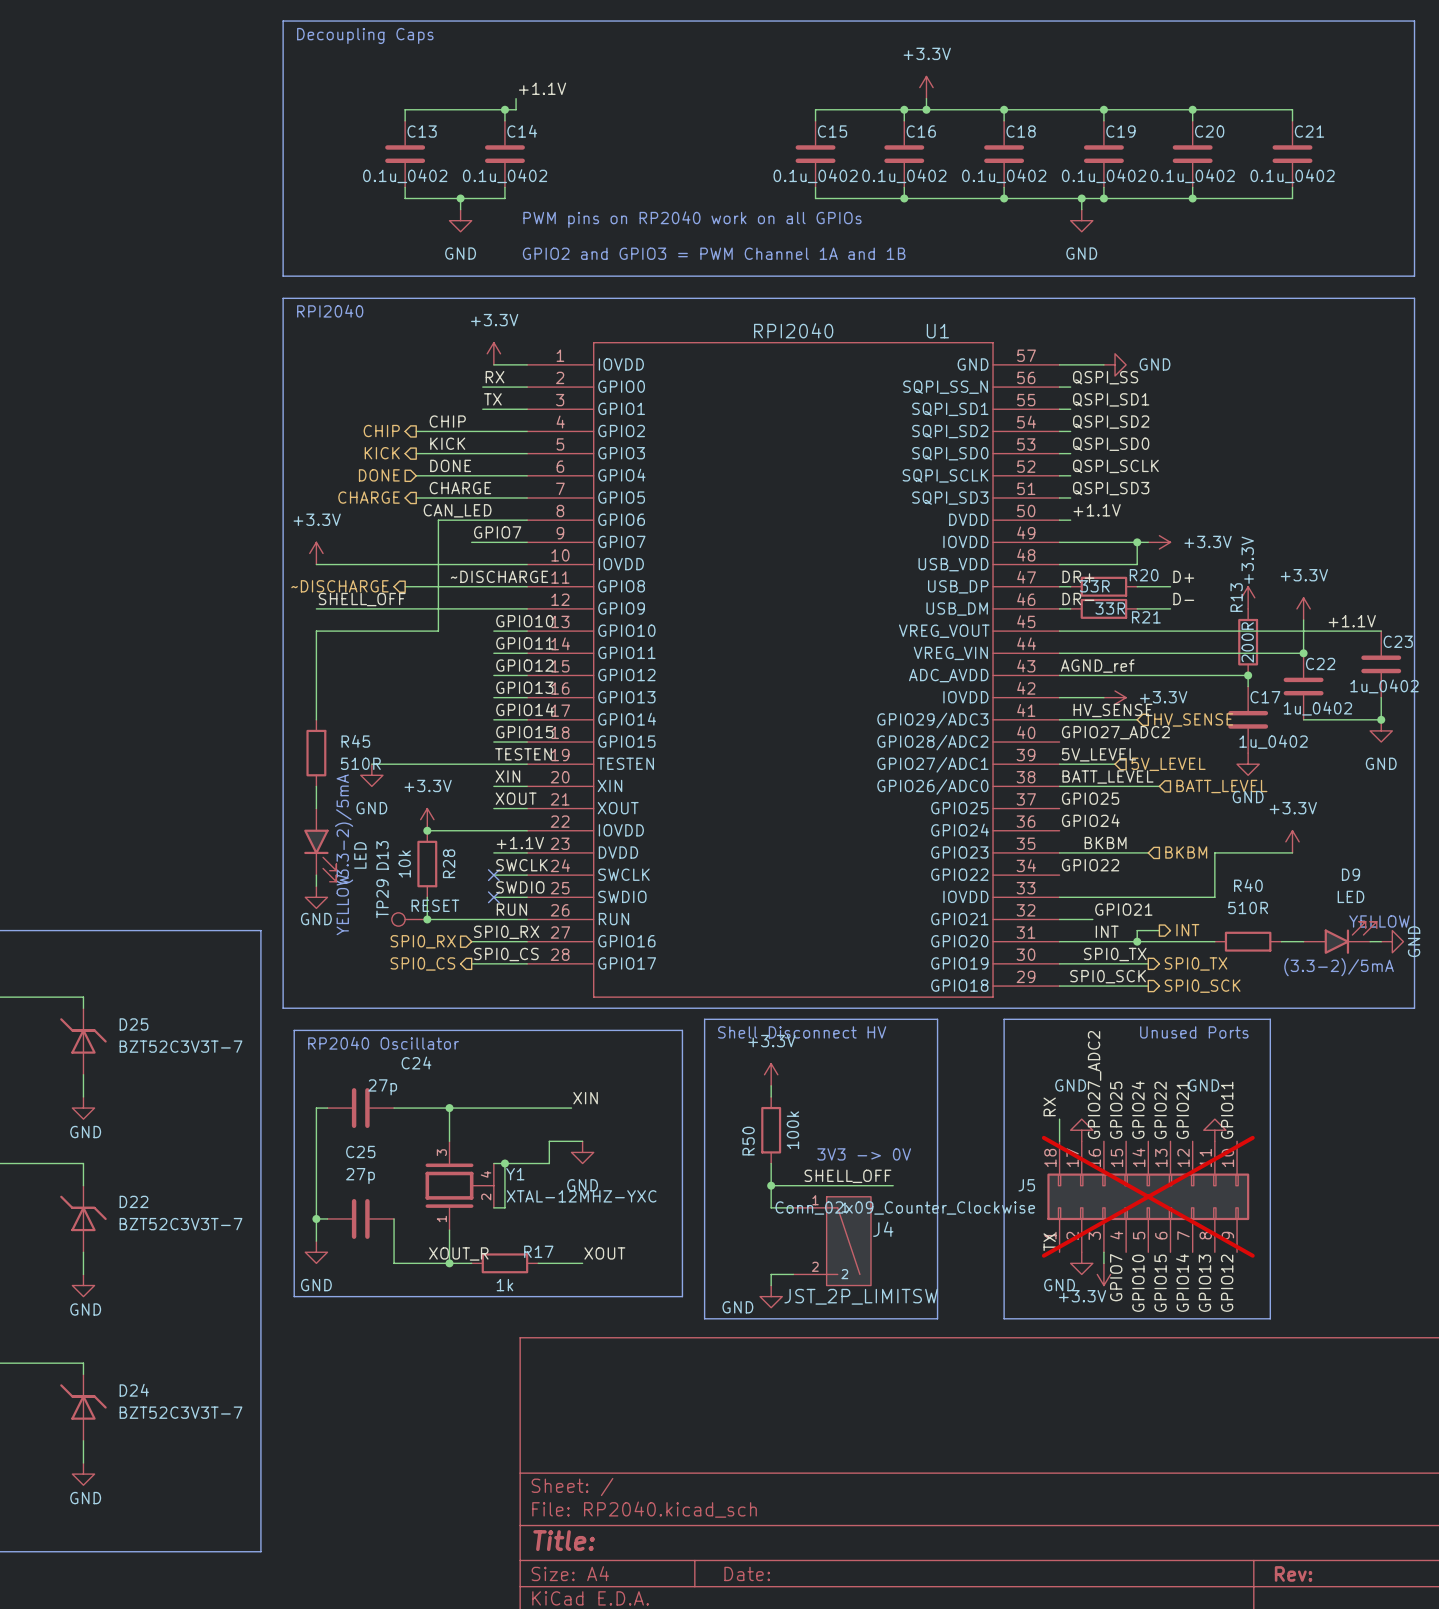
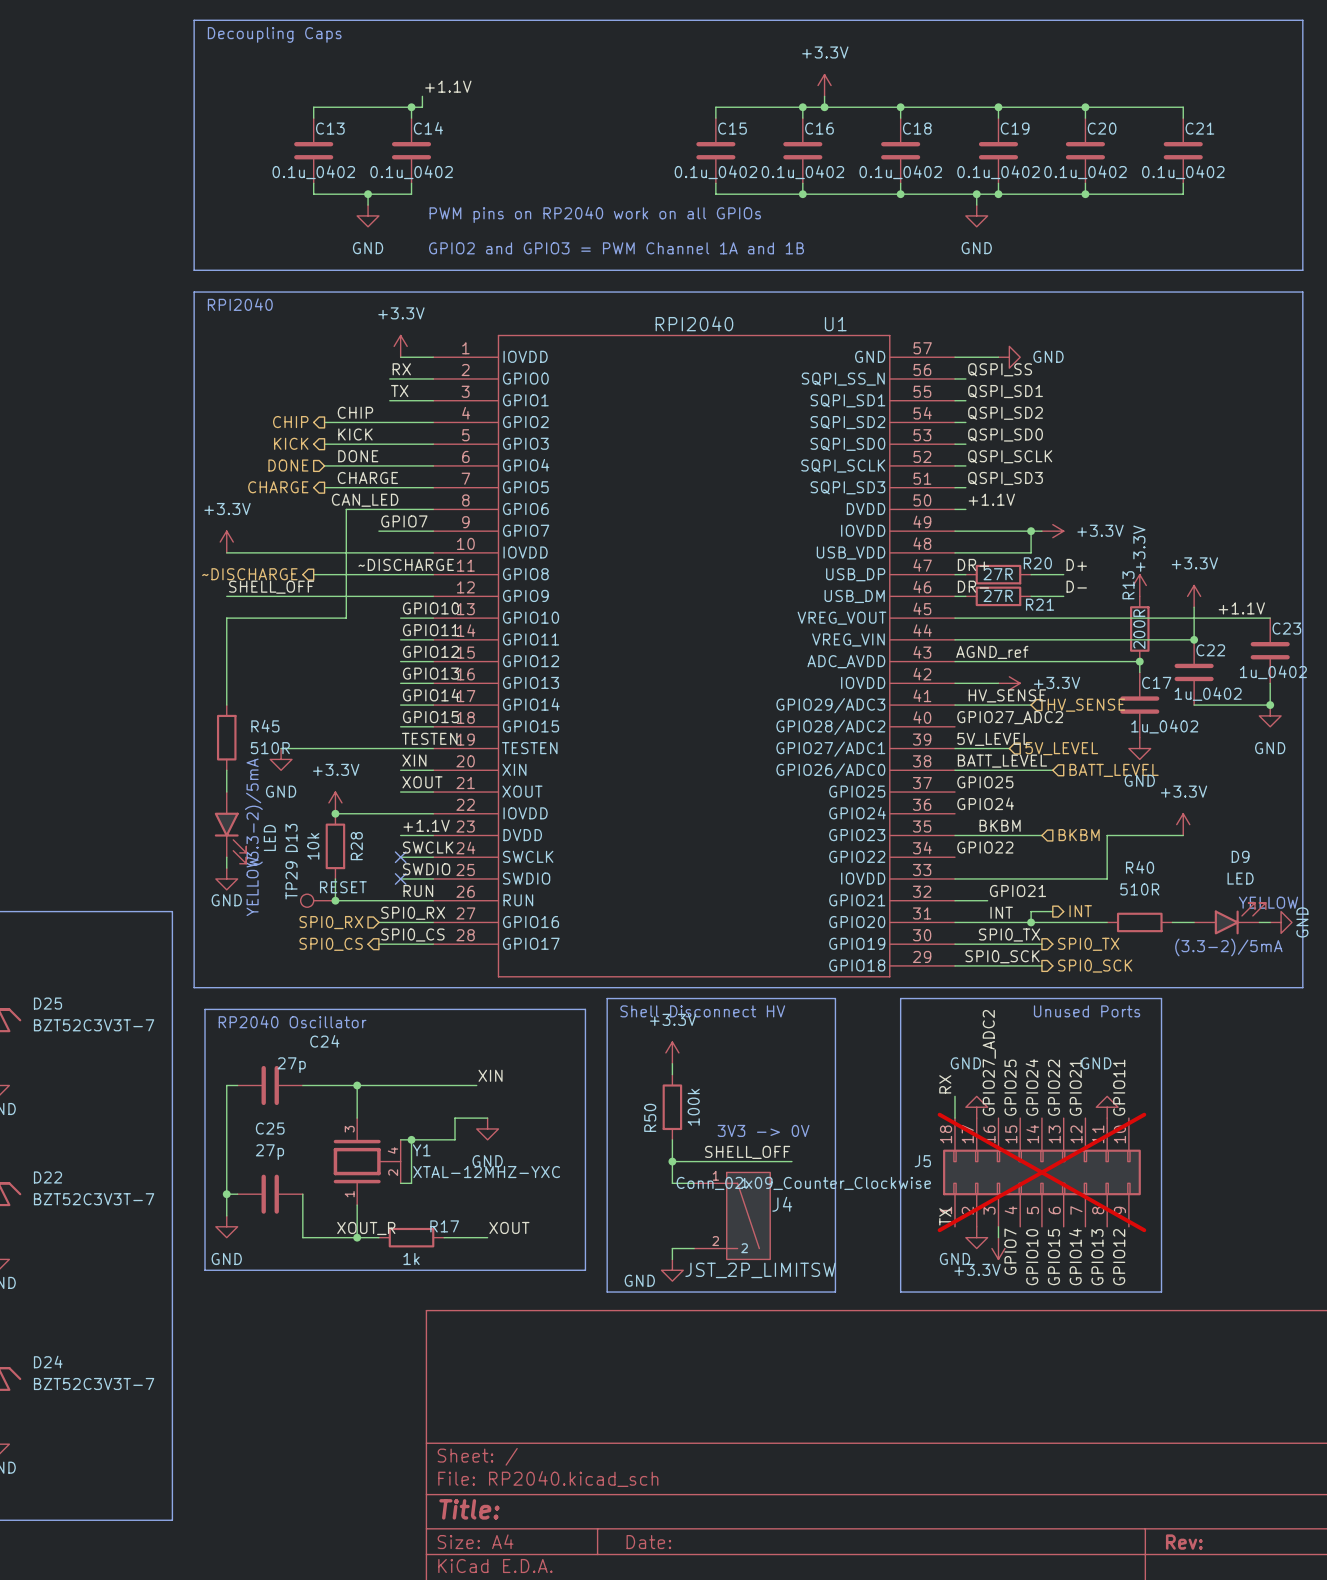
R20 value: 33R (1094, 586) -> 27R (998, 574)
R21 value: 33R (1110, 608) -> 27R (998, 595)

